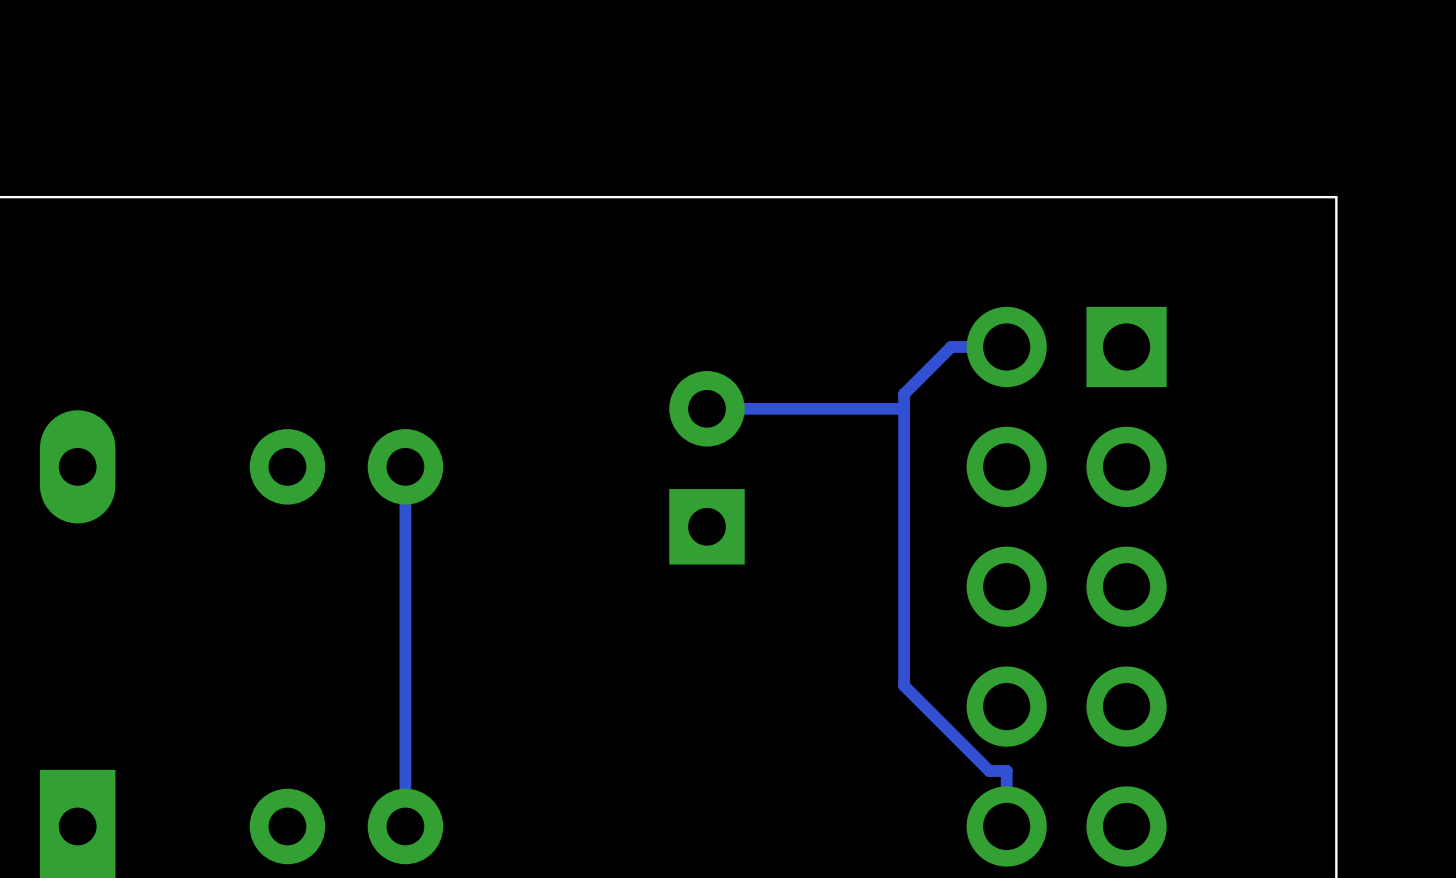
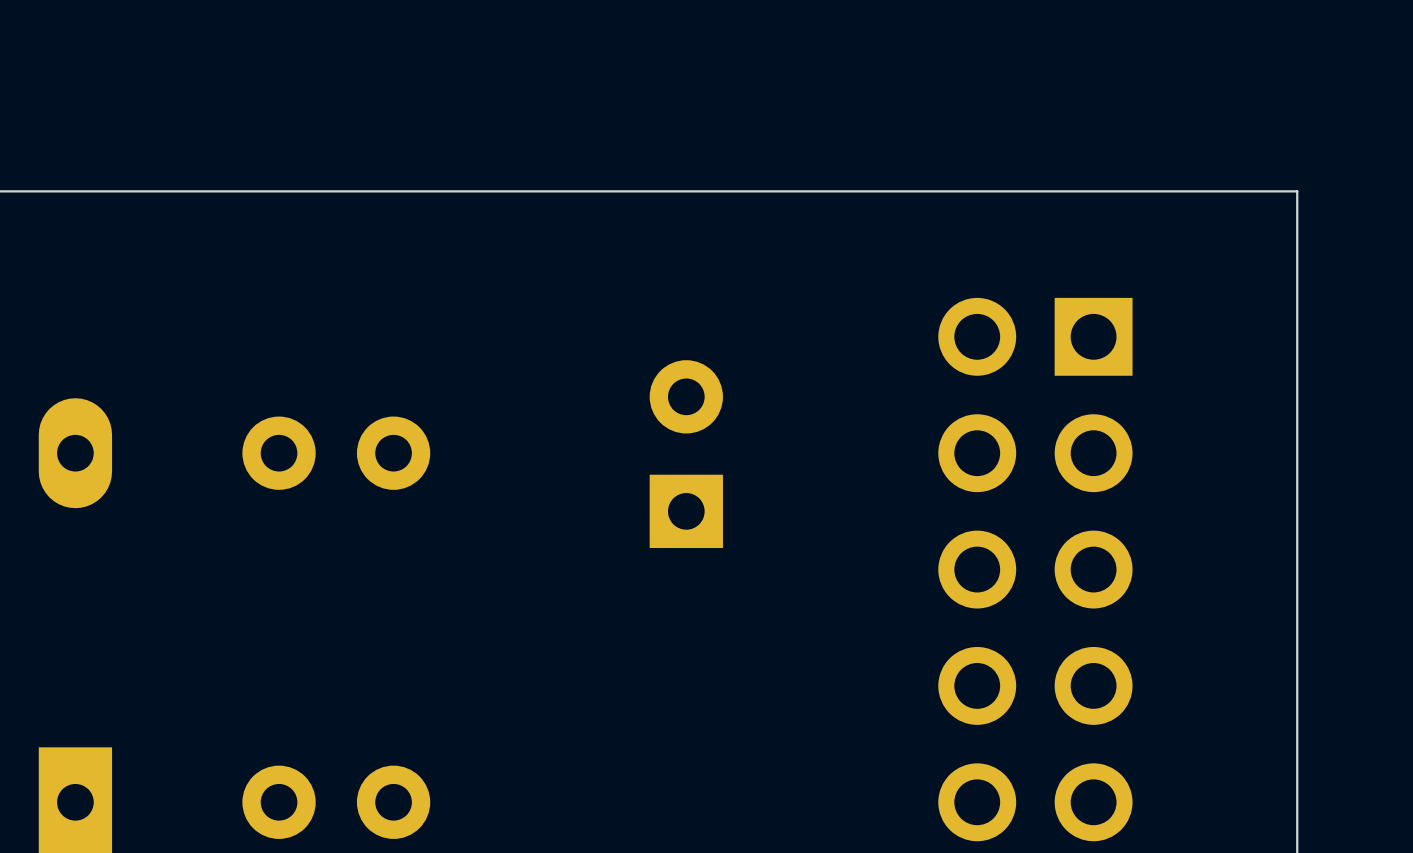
track: (1006, 346) (951, 346) (904, 394) (904, 685) (989, 771) (1006, 771) (1006, 826) -> none
track: (904, 408) (707, 408) -> none
track: (405, 466) (405, 826) -> none

